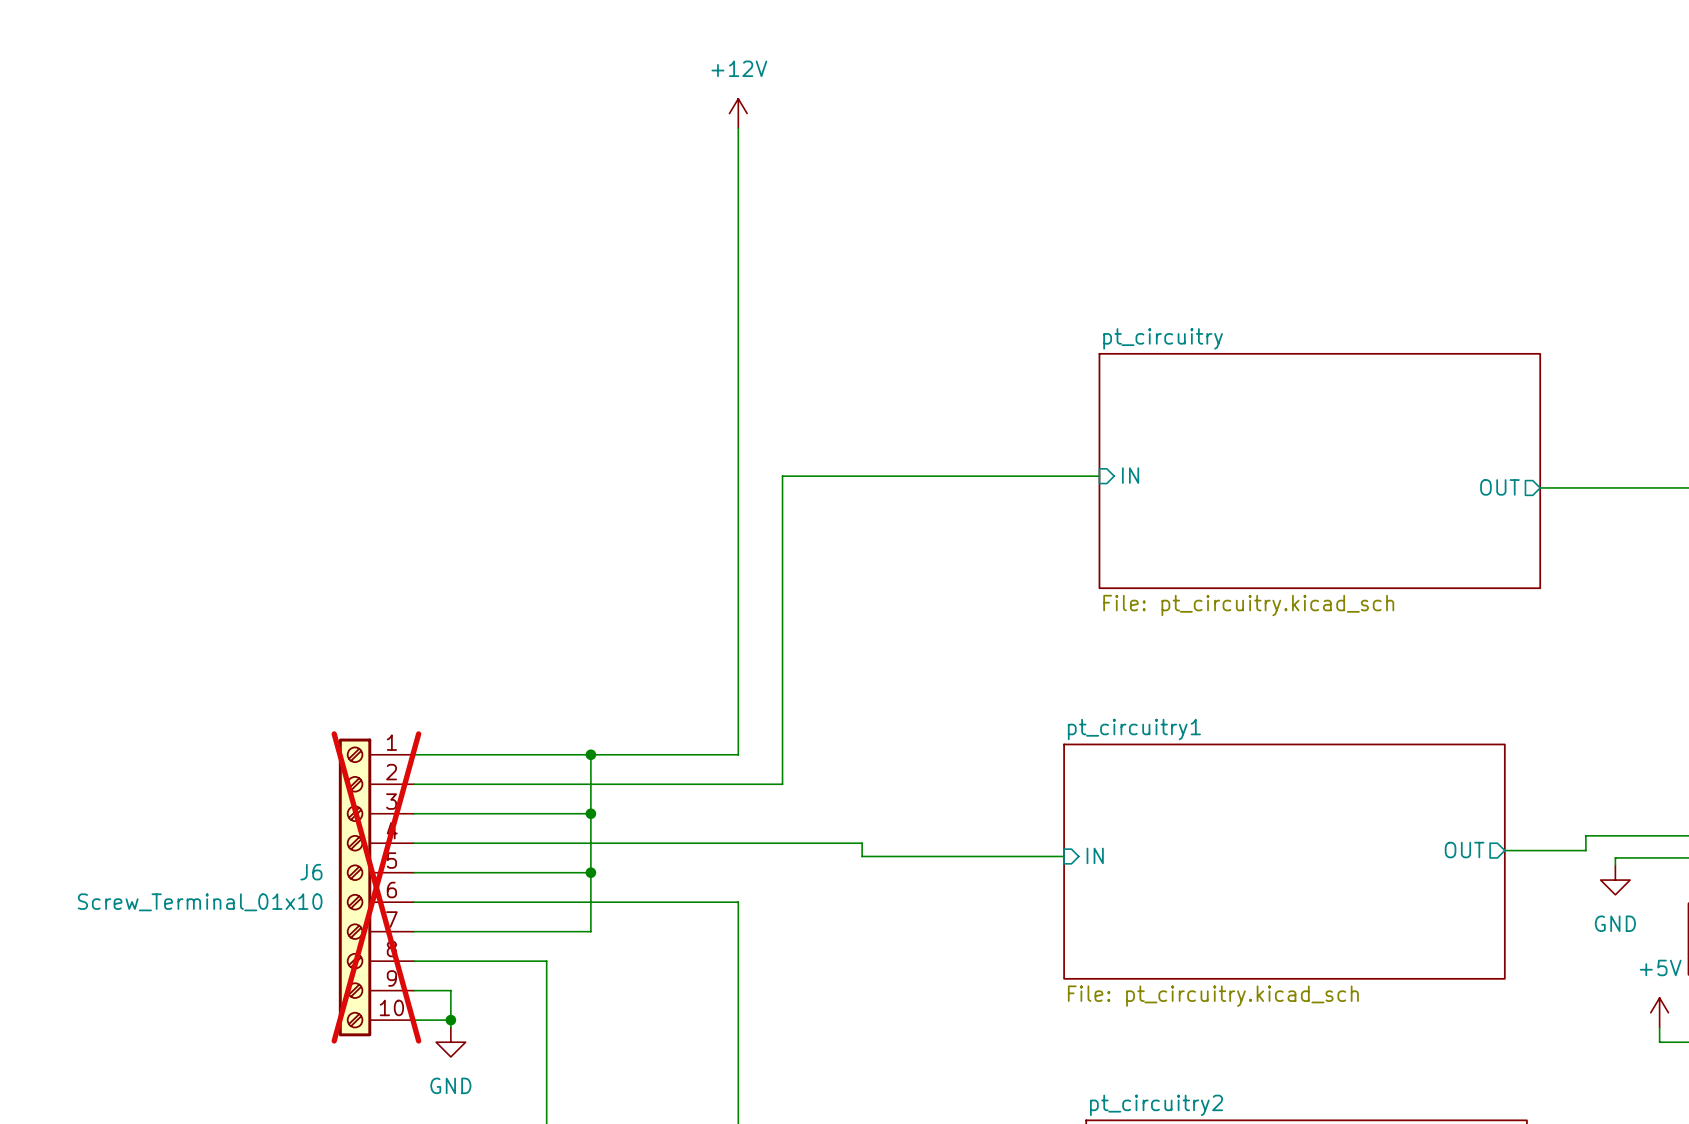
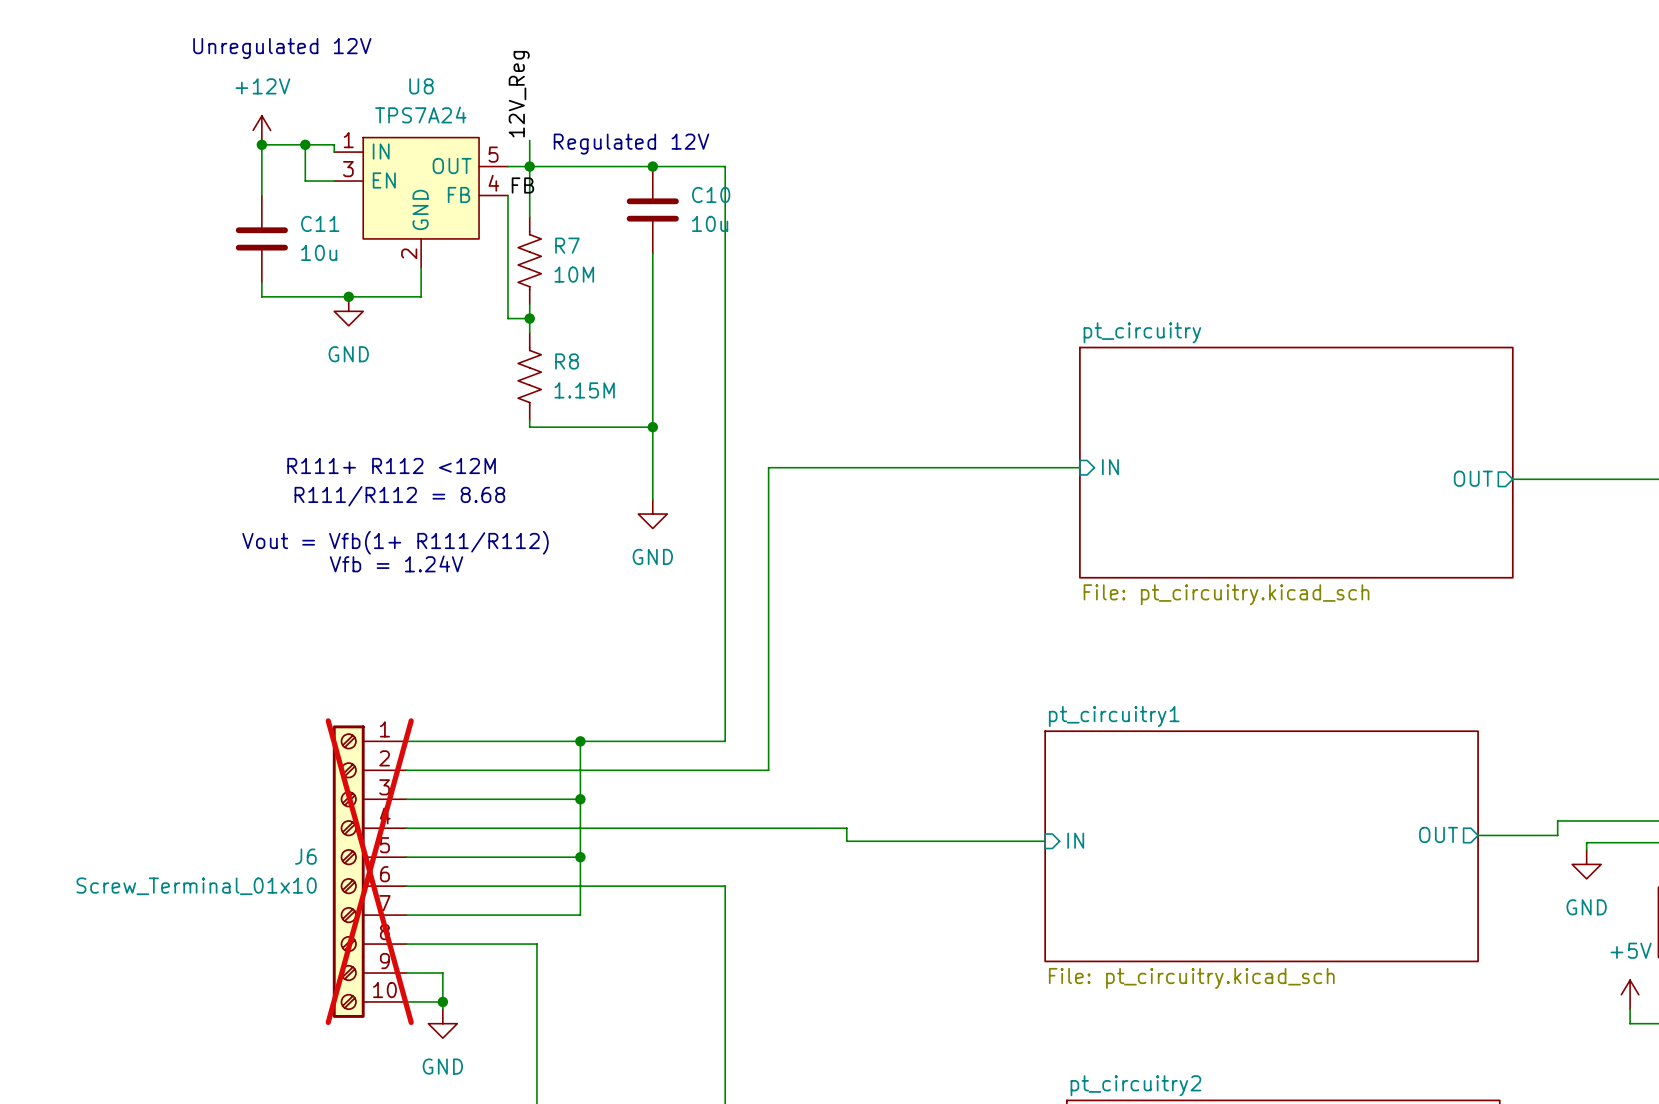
text: none -> Unregulated 12V (282, 48)
label: none -> 12V_Reg (519, 94)
power symbol: +12V (738, 113) -> none
wire: (738, 128) (738, 169) -> (508, 166) (725, 166)
power symbol: none -> +12V (261, 130)
wire: none -> (529, 140) (529, 217)
text: none -> Regulated 12V (631, 144)
junction: none -> (261, 144)
wire: none -> (305, 144) (305, 181) (334, 181)
junction: none -> (305, 144)
wire: none -> (334, 152) (334, 144) (261, 144) (261, 195)
junction: none -> (529, 166)
junction: none -> (652, 166)
label: none -> FB (522, 185)
wire: none -> (508, 195) (508, 318) (529, 318)
U8: none -> TPS7A24 (421, 202)
C10: none -> 10u (652, 209)
C11: none -> 10u (261, 238)
wire: none -> (652, 253) (652, 499)
R7: none -> 10M (529, 260)
wire: none -> (421, 267) (421, 296) (261, 296) (261, 282)
junction: none -> (348, 296)
wire: none -> (529, 304) (529, 333)
power symbol: none -> GND (348, 311)
junction: none -> (529, 318)
R8: none -> 1.15M (529, 376)
wire: none -> (529, 419) (529, 427) (652, 427)
junction: none -> (652, 427)
text: none -> R111+ R112 <12M (391, 465)
text: none -> R111/R112 = 8.68 (399, 496)
power symbol: none -> GND (652, 514)
text: none -> Vout = Vfb(1+ R111/R112) (395, 542)
text: none -> Vfb = 1.24V (396, 563)

